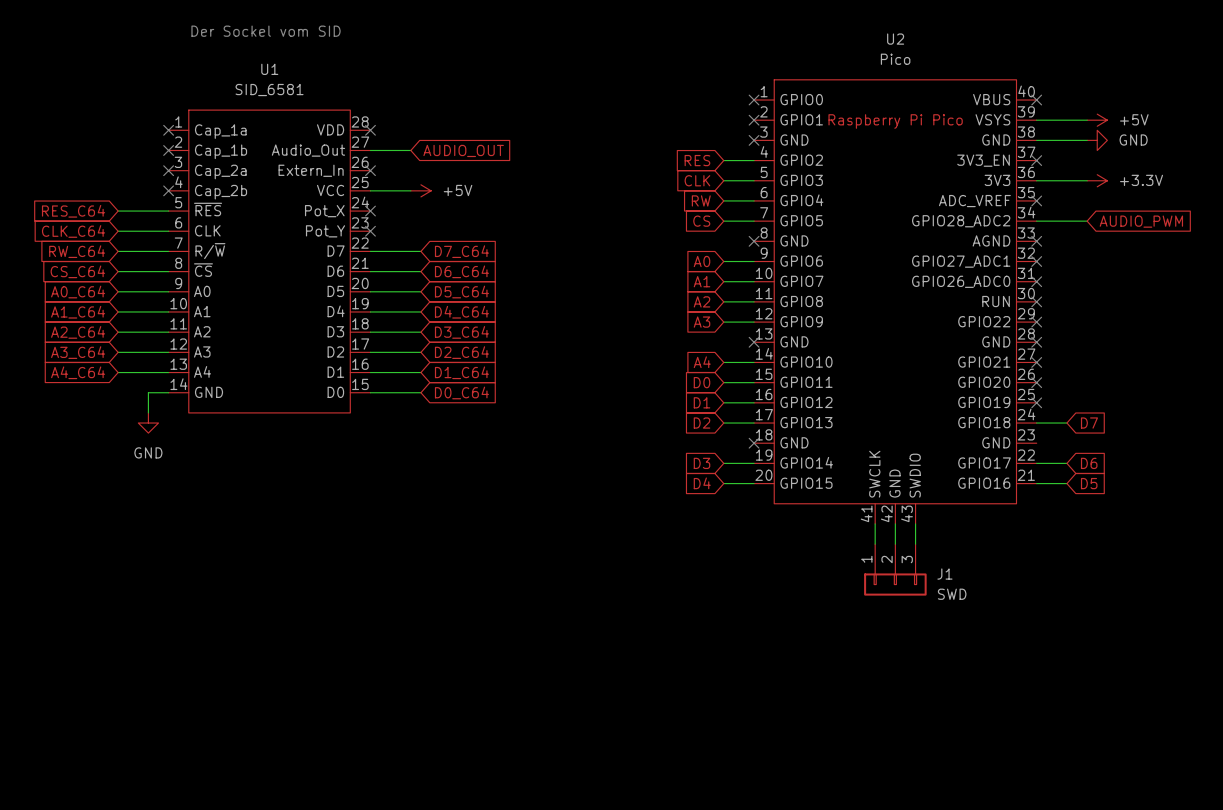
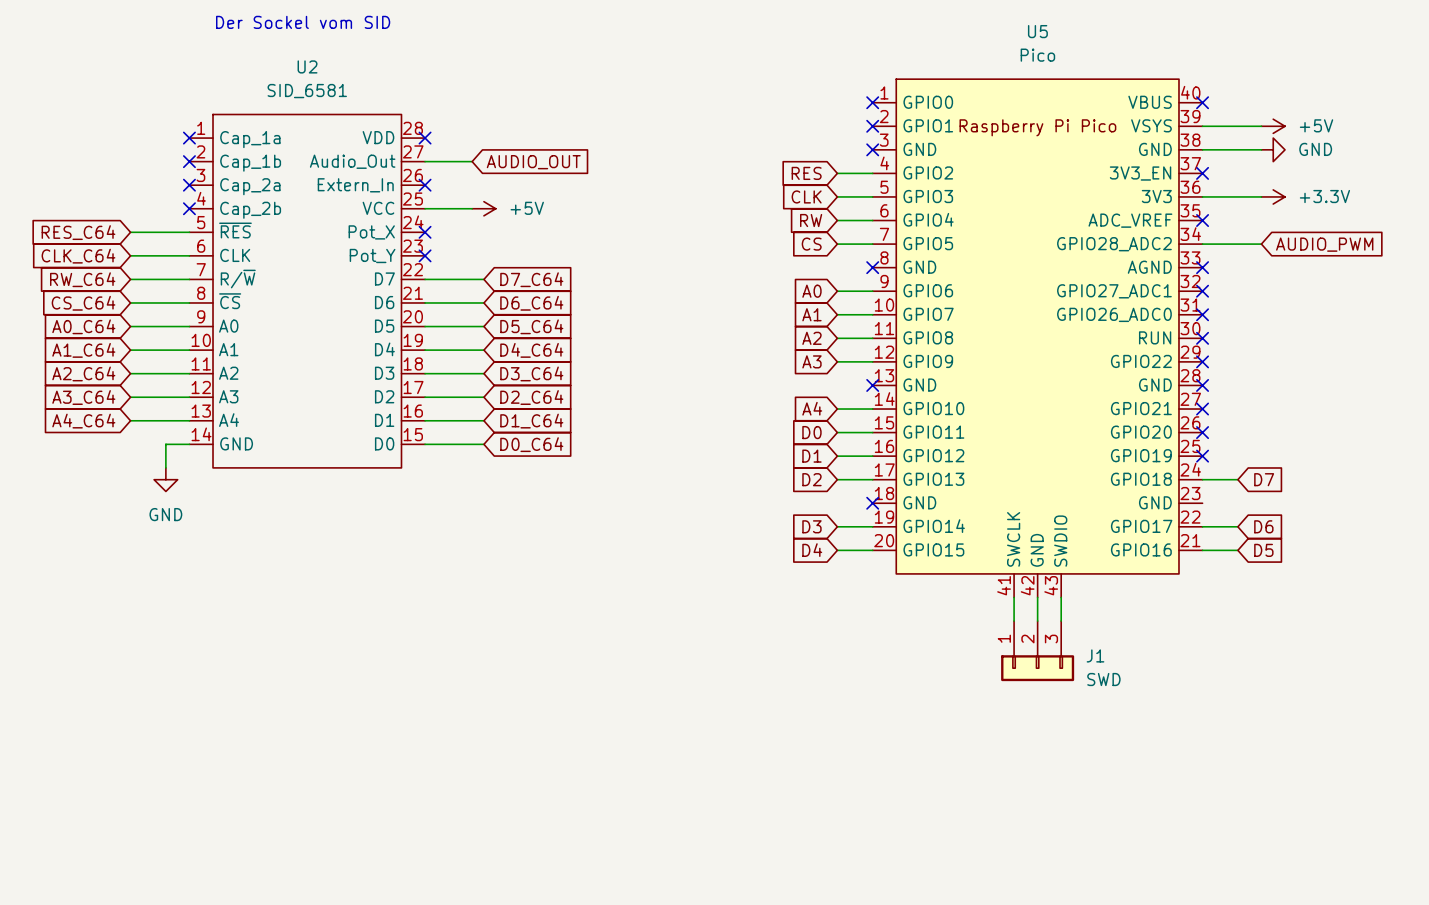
U2 name: U2 (895, 39) -> U5 (1037, 31)
U1 name: U1 (269, 69) -> U2 (307, 66)

